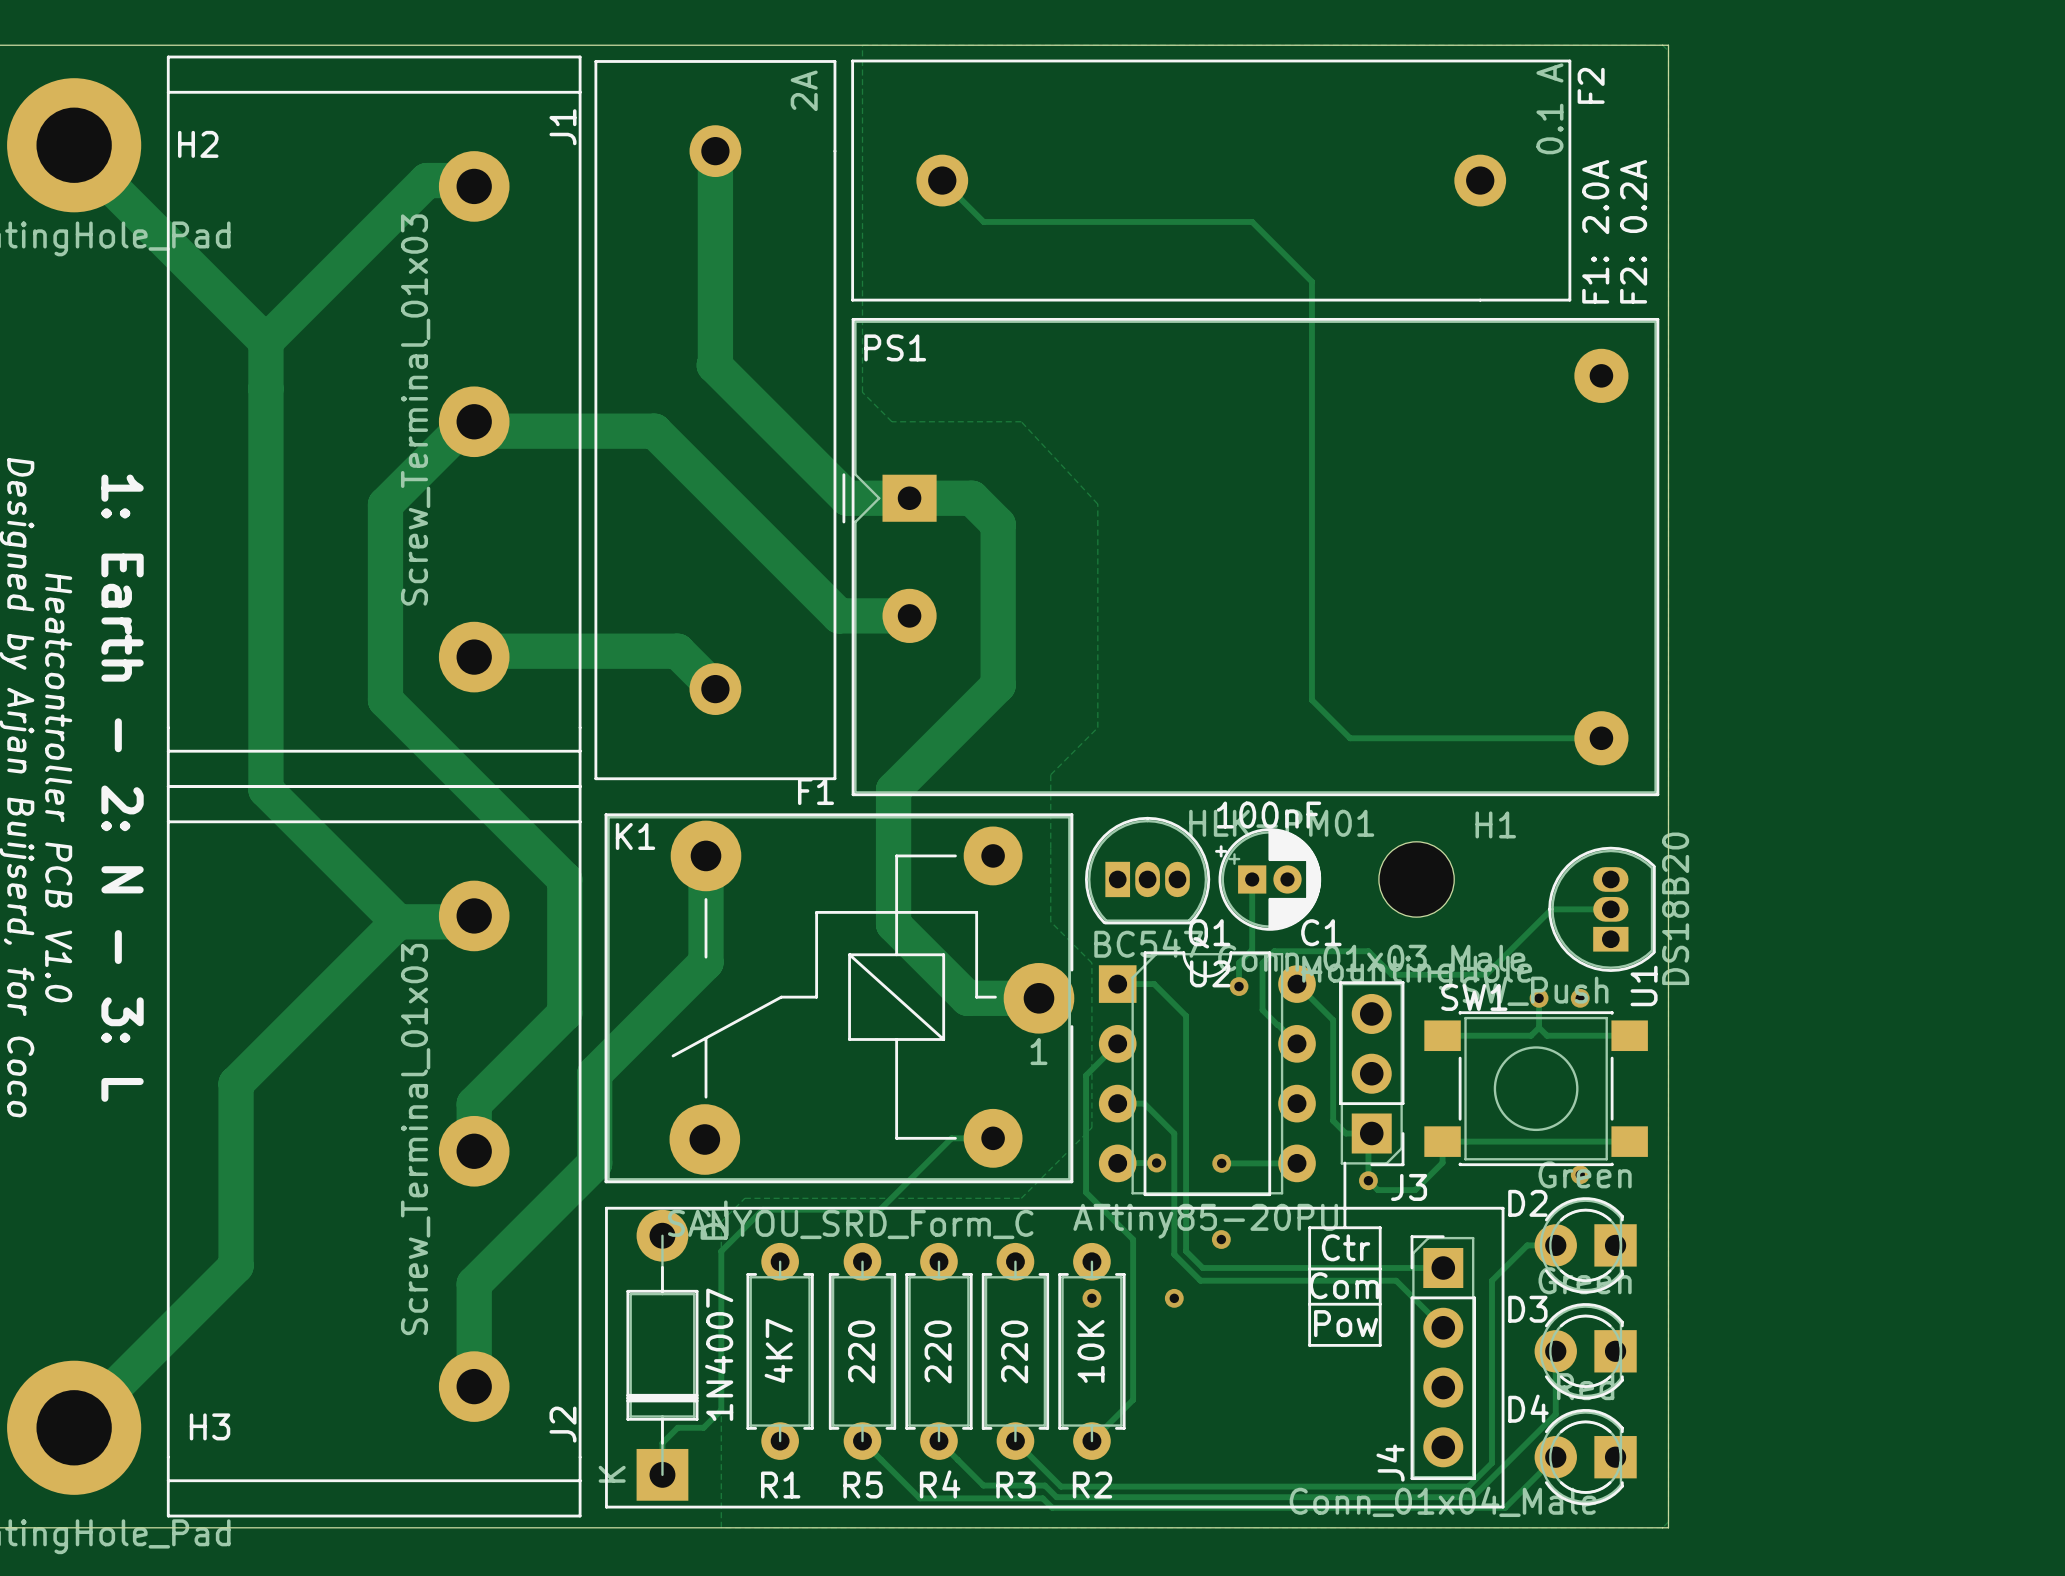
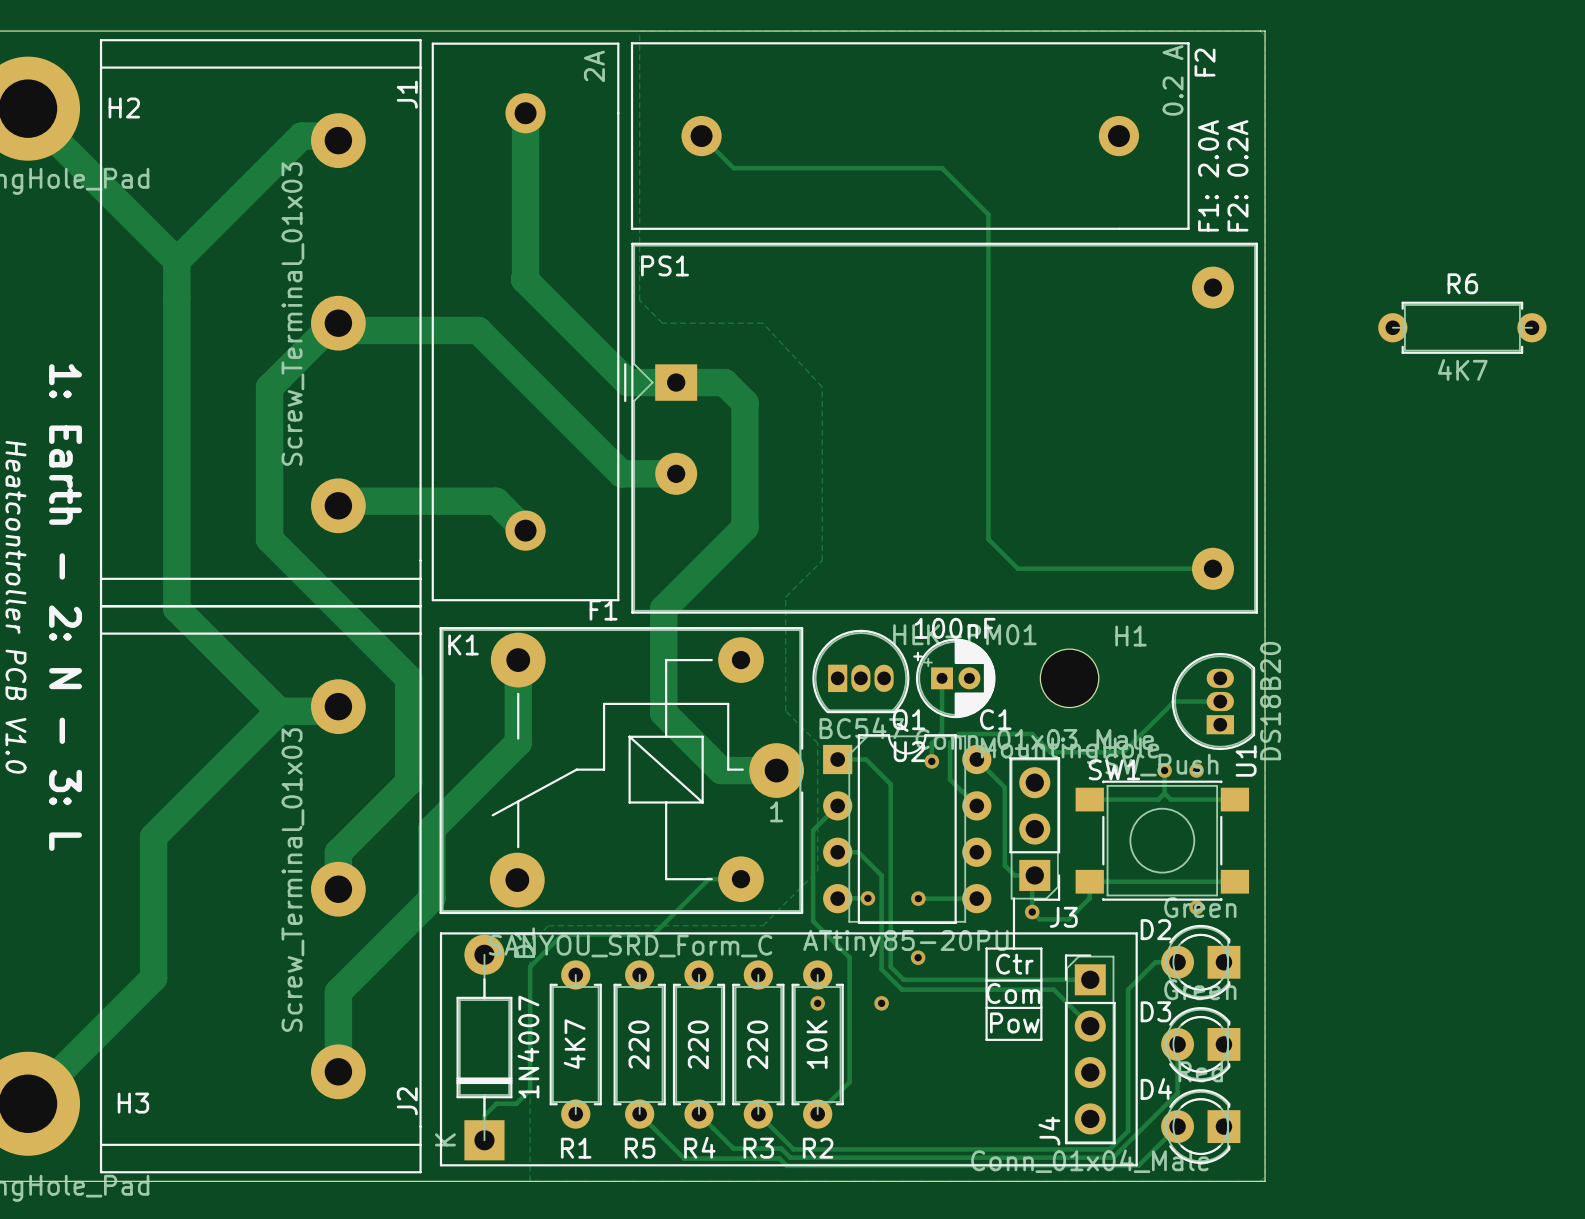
F2 value: 0.1 A (1549, 108) -> 0.2 A (1173, 80)
R6: none -> 4K7 (1462, 327)

